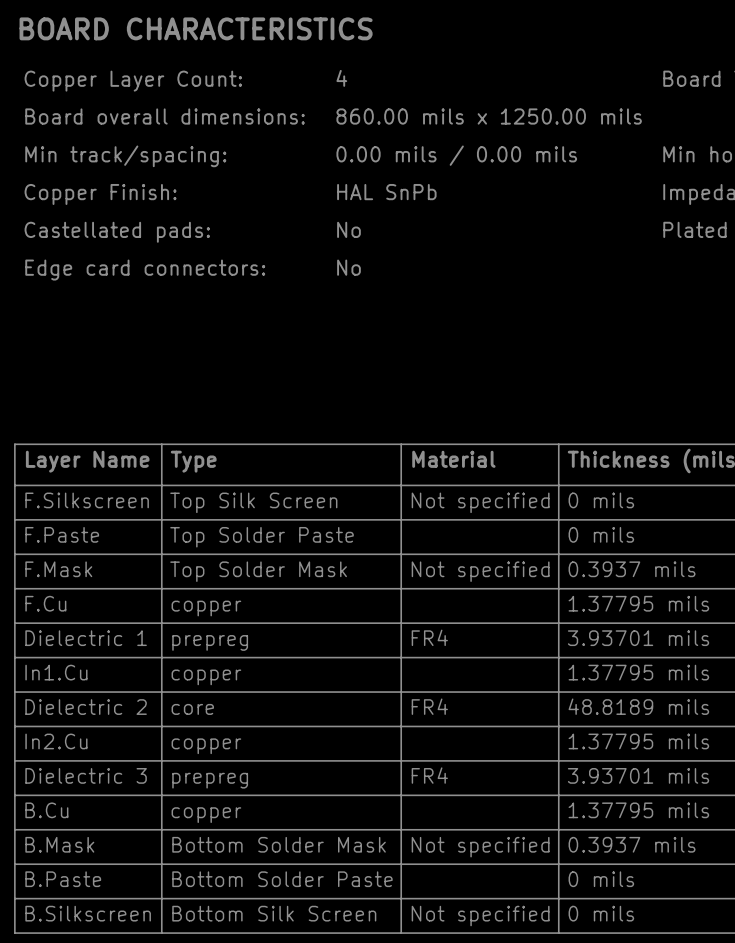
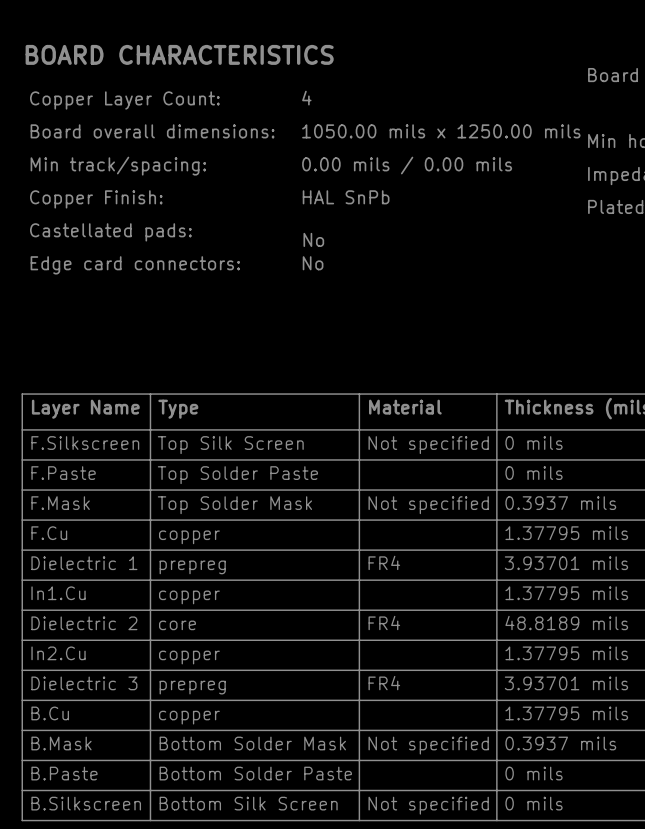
text position: BOARD CHARACTERISTICS (196, 28) -> BOARD CHARACTERISTICS (179, 54)
text position: 4 (341, 78) -> 4 (306, 98)
text position: Copper Layer Count: (133, 81) -> Copper Layer Count: (124, 100)
text position: Board overall dimensions: (165, 116) -> Board overall dimensions: (152, 131)
text: 860.00 mils x 1250.00 mils (489, 116) -> 1050.00 mils x 1250.00 mils (441, 131)
text position: 0.00 mils / 0.00 mils (456, 155) -> 0.00 mils / 0.00 mils (407, 165)
text position: Min track/spacing: (125, 156) -> Min track/spacing: (118, 166)
text position: HAL SnPb (386, 192) -> HAL SnPb (346, 197)
text position: Copper Finish: (100, 194) -> Copper Finish: (96, 199)
text position: No (348, 229) -> No (313, 263)
text position: Castellated pads: (117, 232) -> Castellated pads: (110, 232)
text position: Edge card connectors: (145, 270) -> Edge card connectors: (135, 265)

